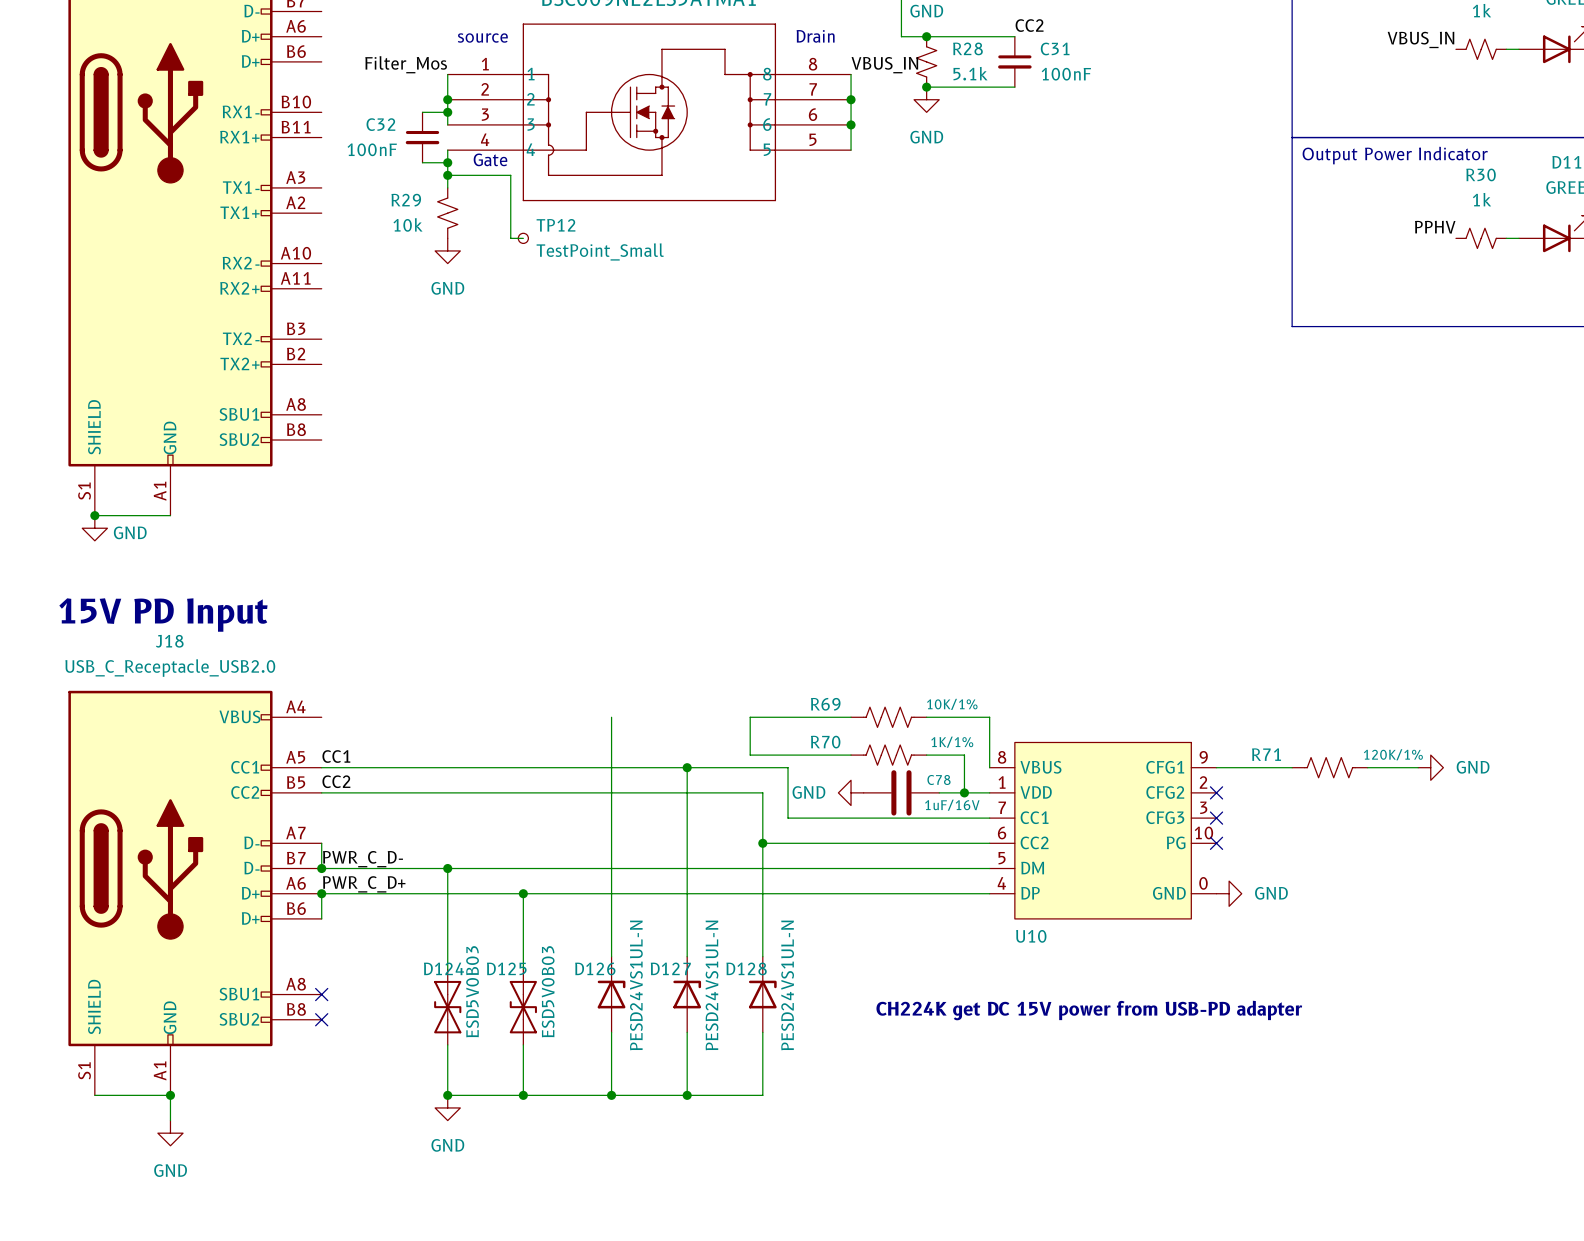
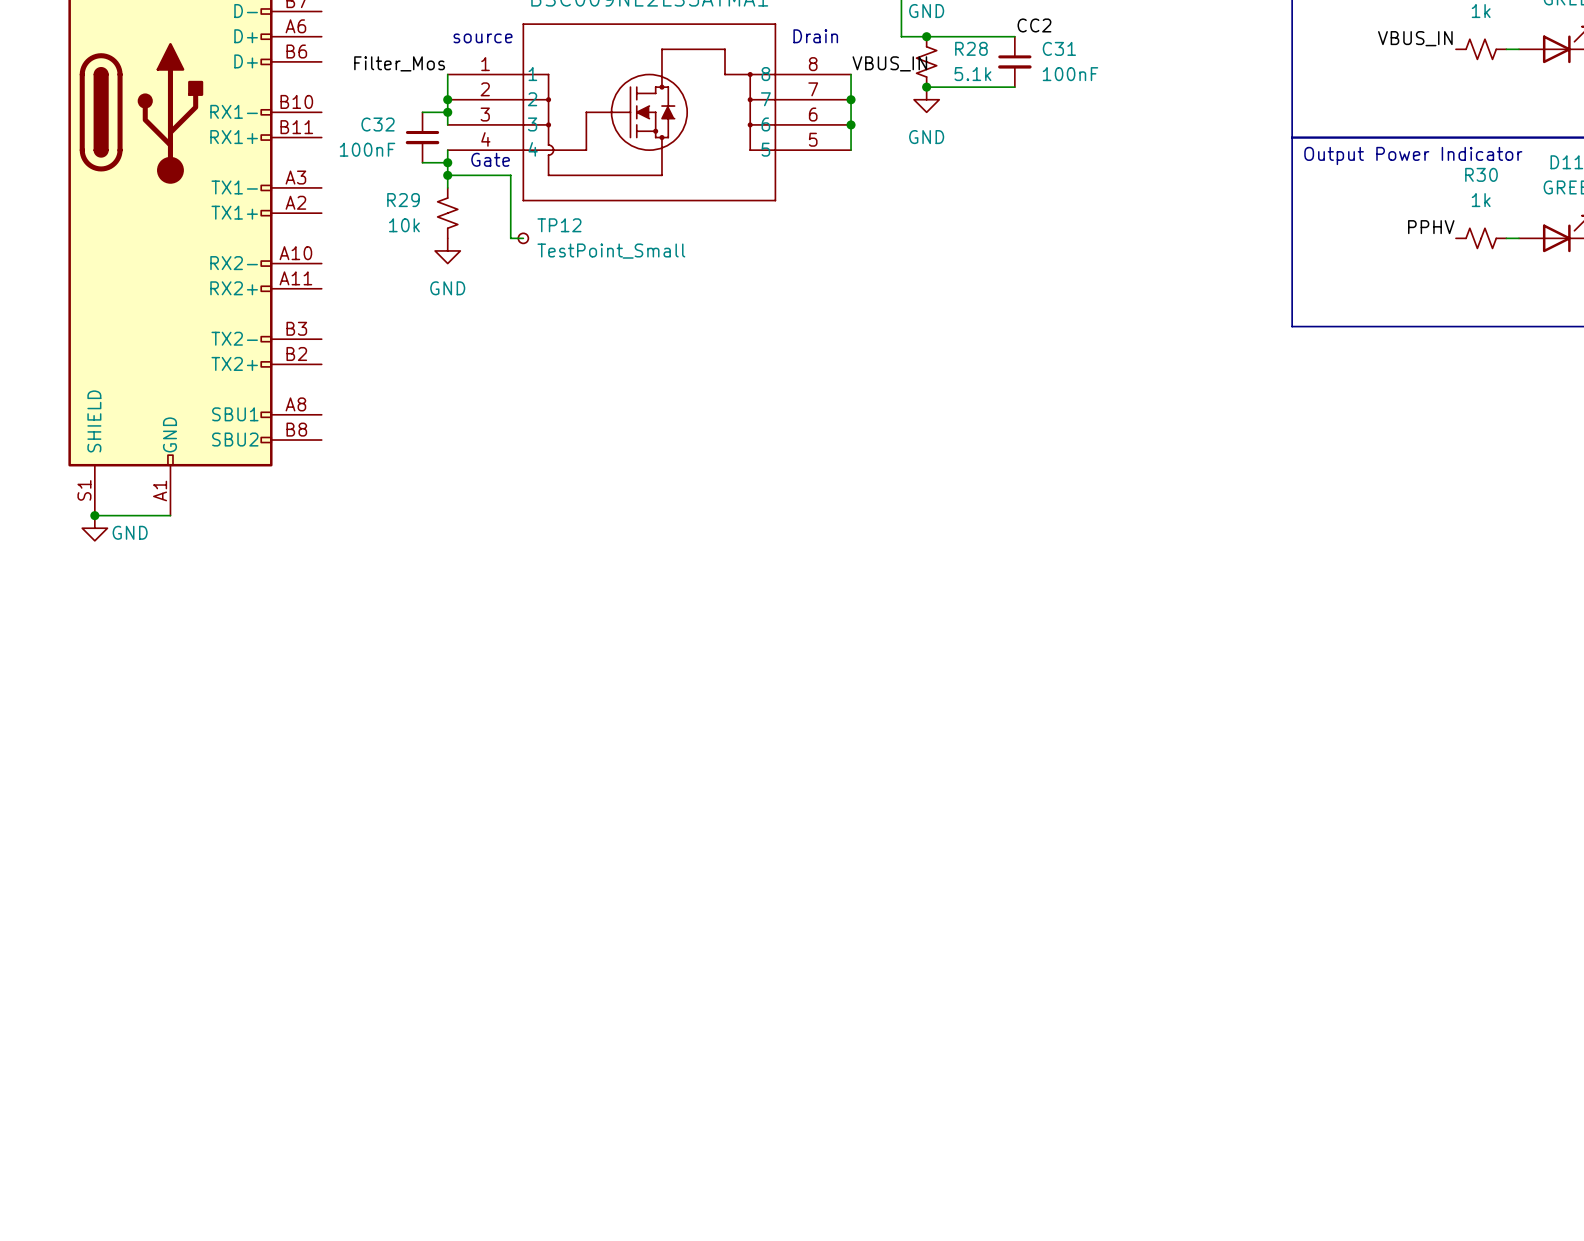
text: 15V PD Input (163, 615) -> none
wire: (611, 717) (611, 956) -> none
wire: (851, 717) (750, 717) (750, 755) (851, 755) -> none
R69: 10K/1% (888, 717) -> none
wire: (926, 717) (989, 717) (989, 767) -> none
R70: 1K/1% (888, 755) -> none
wire: (926, 755) (964, 755) (964, 792) -> none
label: CC1 (336, 756) -> none
wire: (321, 767) (788, 767) (788, 818) (989, 818) -> none
wire: (687, 767) (687, 956) -> none
junction: (687, 767) -> none
wire: (1216, 767) (1292, 767) -> none
R71: 120K/1% (1329, 767) -> none
wire: (1367, 767) (1418, 767) -> none
power symbol: GND (1430, 767) -> none
label: CC2 (336, 781) -> none
wire: (321, 792) (762, 792) (762, 956) -> none
power symbol: GND (851, 792) -> none
C78: 1uF/16V (901, 792) -> none
wire: (939, 792) (989, 792) -> none
junction: (964, 792) -> none
no-connect mark: (1216, 792) -> none
no-connect mark: (1216, 818) -> none
U10: (1103, 830) -> none
wire: (321, 843) (321, 868) (989, 868) -> none
wire: (762, 843) (989, 843) -> none
junction: (762, 843) -> none
no-connect mark: (1216, 843) -> none
label: PWR_C_D- (362, 859) -> none
junction: (321, 868) -> none
wire: (447, 868) (447, 969) -> none
junction: (447, 868) -> none
label: PWR_C_D+ (364, 884) -> none
J18: USB_C_Receptacle_USB2.0 (195, 893) -> none
junction: (321, 893) -> none
wire: (523, 893) (523, 969) -> none
junction: (523, 893) -> none
wire: (989, 893) (321, 893) (321, 918) -> none
power symbol: GND (1229, 893) -> none
no-connect mark: (321, 994) -> none
D126: PESD24VS1UL-N (611, 994) -> none
D127: PESD24VS1UL-N (687, 994) -> none
D128: PESD24VS1UL-N (762, 994) -> none
D124: ESD5V0B03 (447, 1007) -> none
D125: ESD5V0B03 (523, 1007) -> none
text: CH224K get DC 15V power from USB-PD adapter (1089, 1010) -> none
no-connect mark: (321, 1019) -> none
wire: (611, 1032) (611, 1095) -> none
wire: (687, 1032) (687, 1095) -> none
wire: (762, 1032) (762, 1095) (447, 1095) (447, 1044) -> none
wire: (523, 1044) (523, 1095) -> none
wire: (94, 1095) (170, 1095) (170, 1120) -> none
junction: (170, 1095) -> none
junction: (447, 1095) -> none
junction: (523, 1095) -> none
junction: (611, 1095) -> none
junction: (687, 1095) -> none
power symbol: GND (447, 1107) -> none
power symbol: GND (170, 1133) -> none

